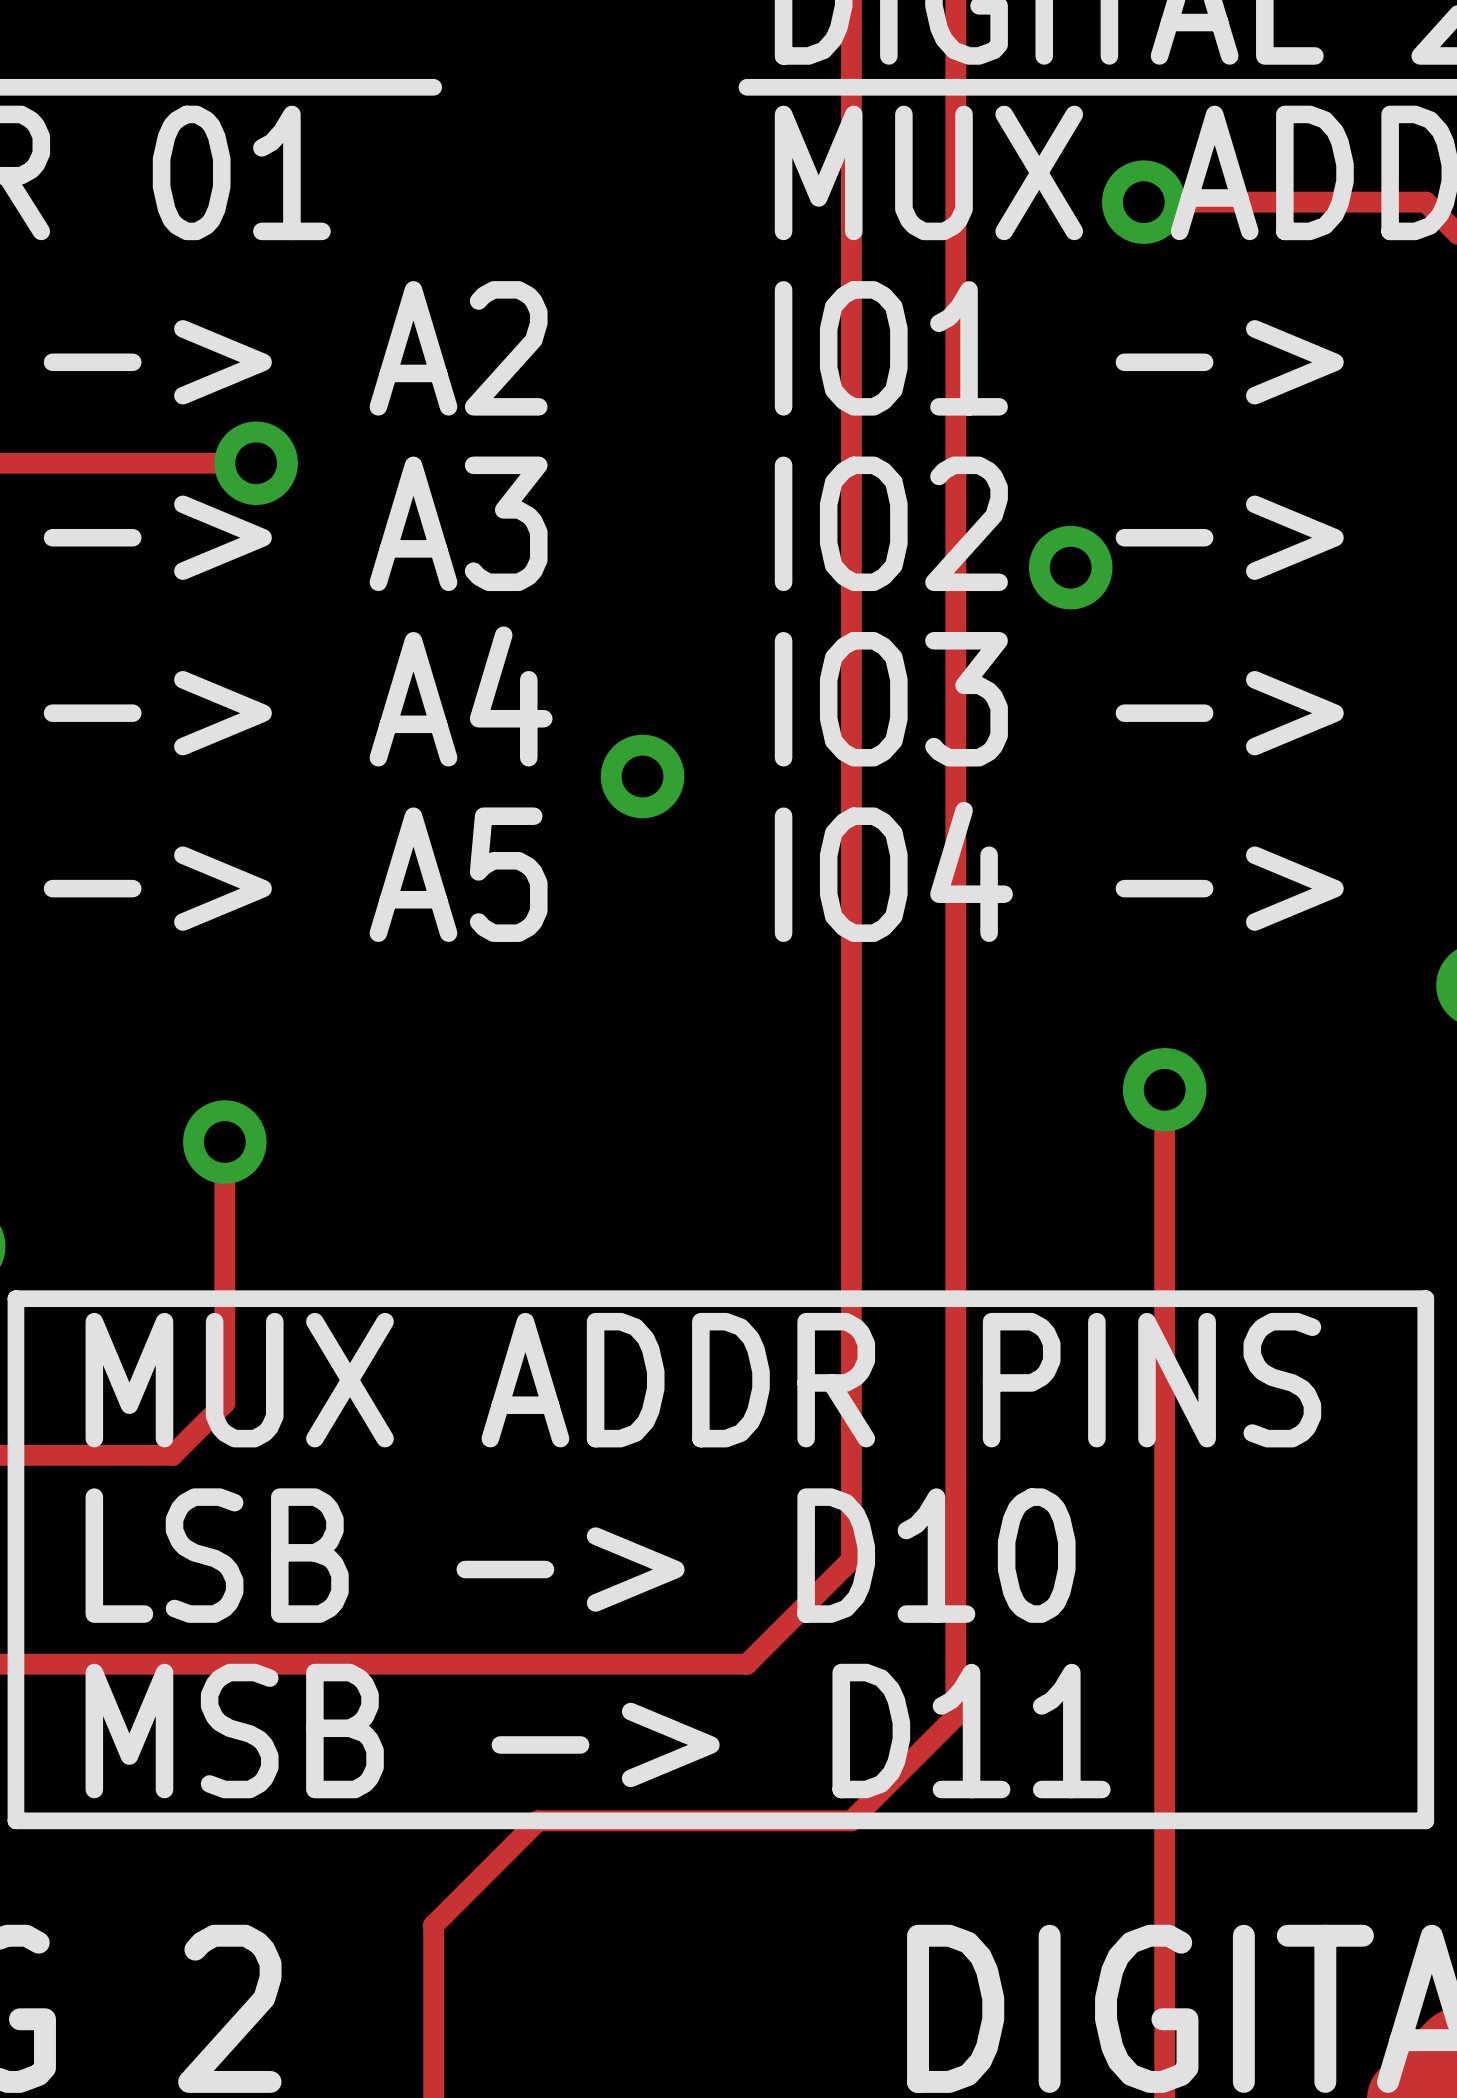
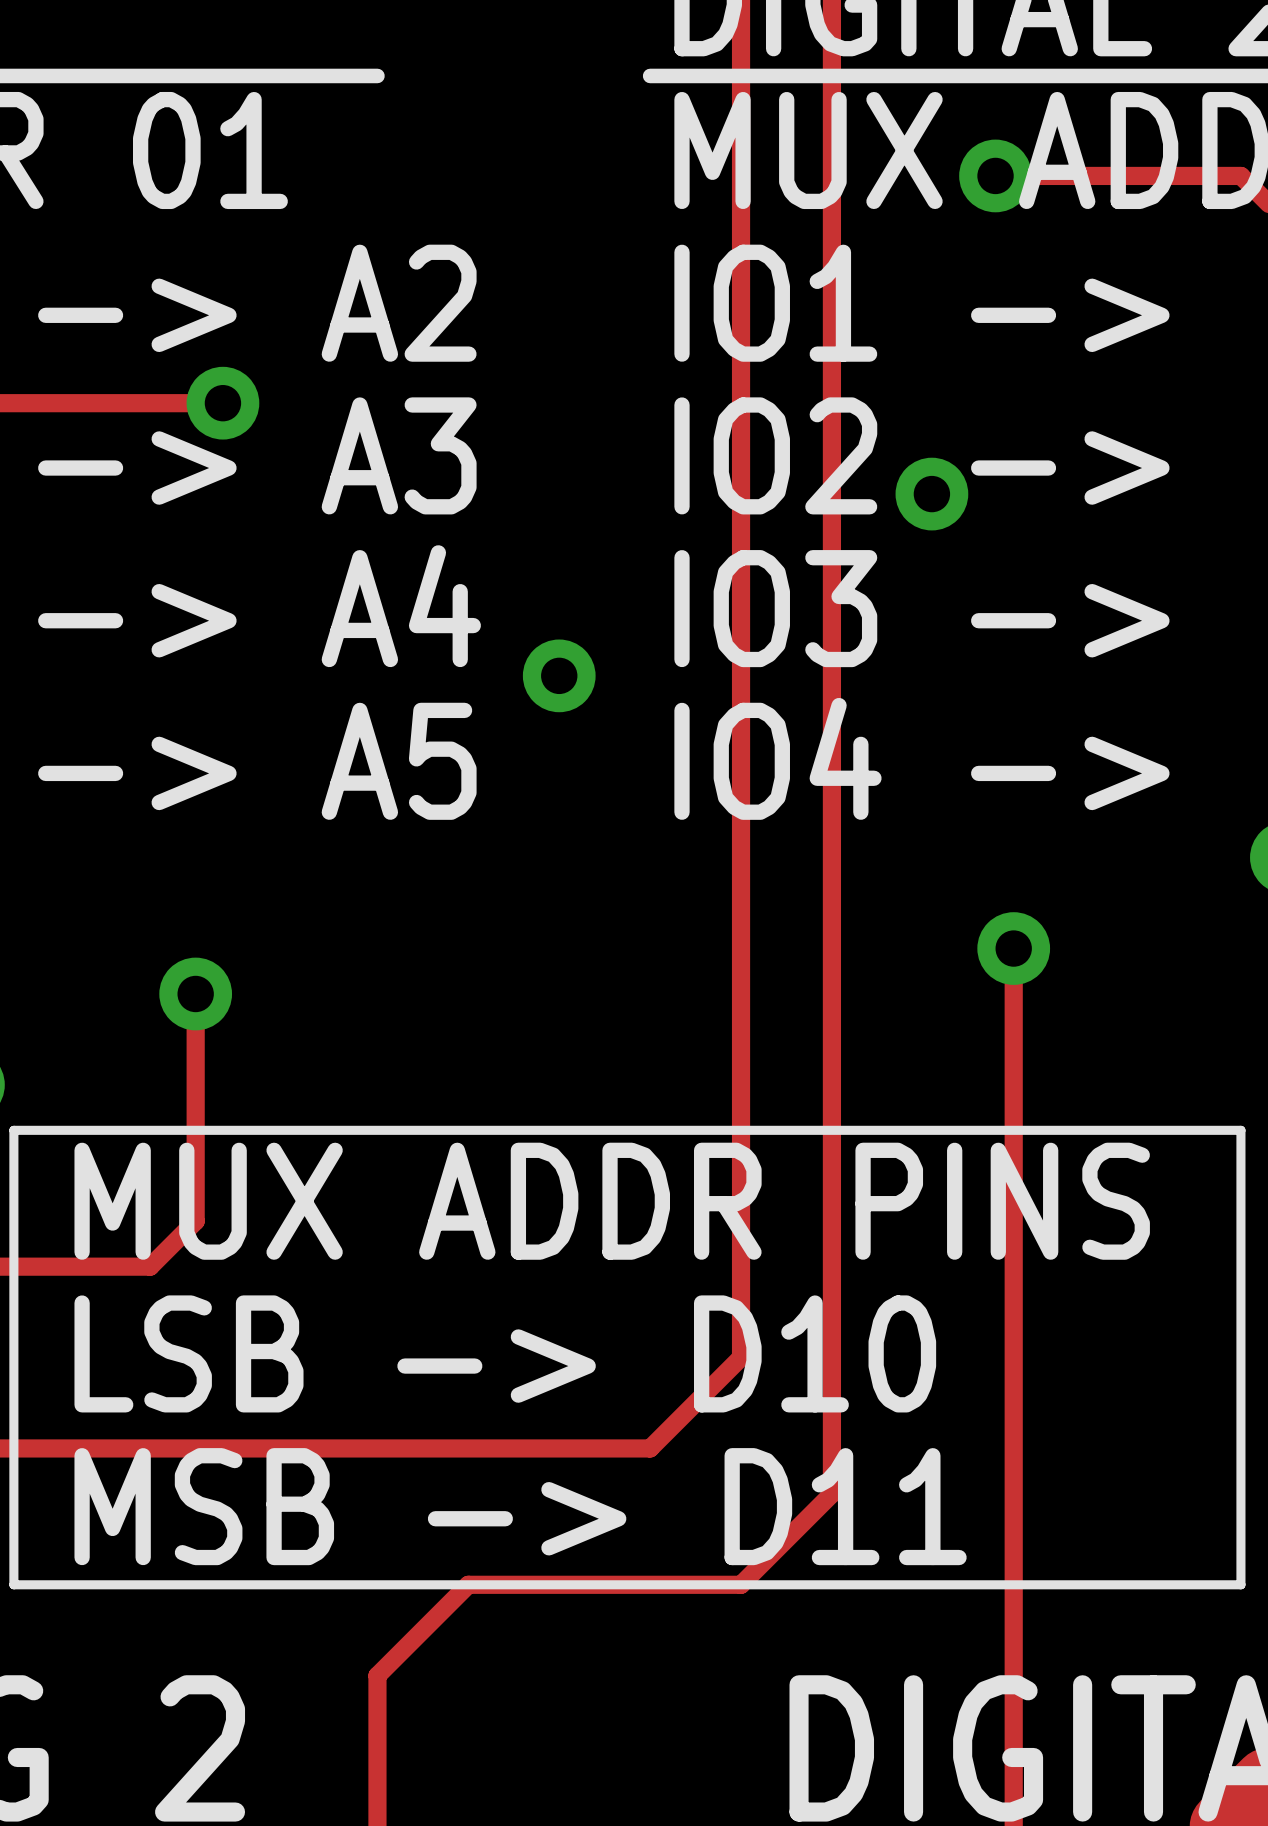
line width: thick (15, 1298) (15, 1820) (1425, 1820) (1425, 1298) (15, 1298) -> thin (13, 1130) (13, 1584) (1240, 1584) (1240, 1130) (13, 1130)

